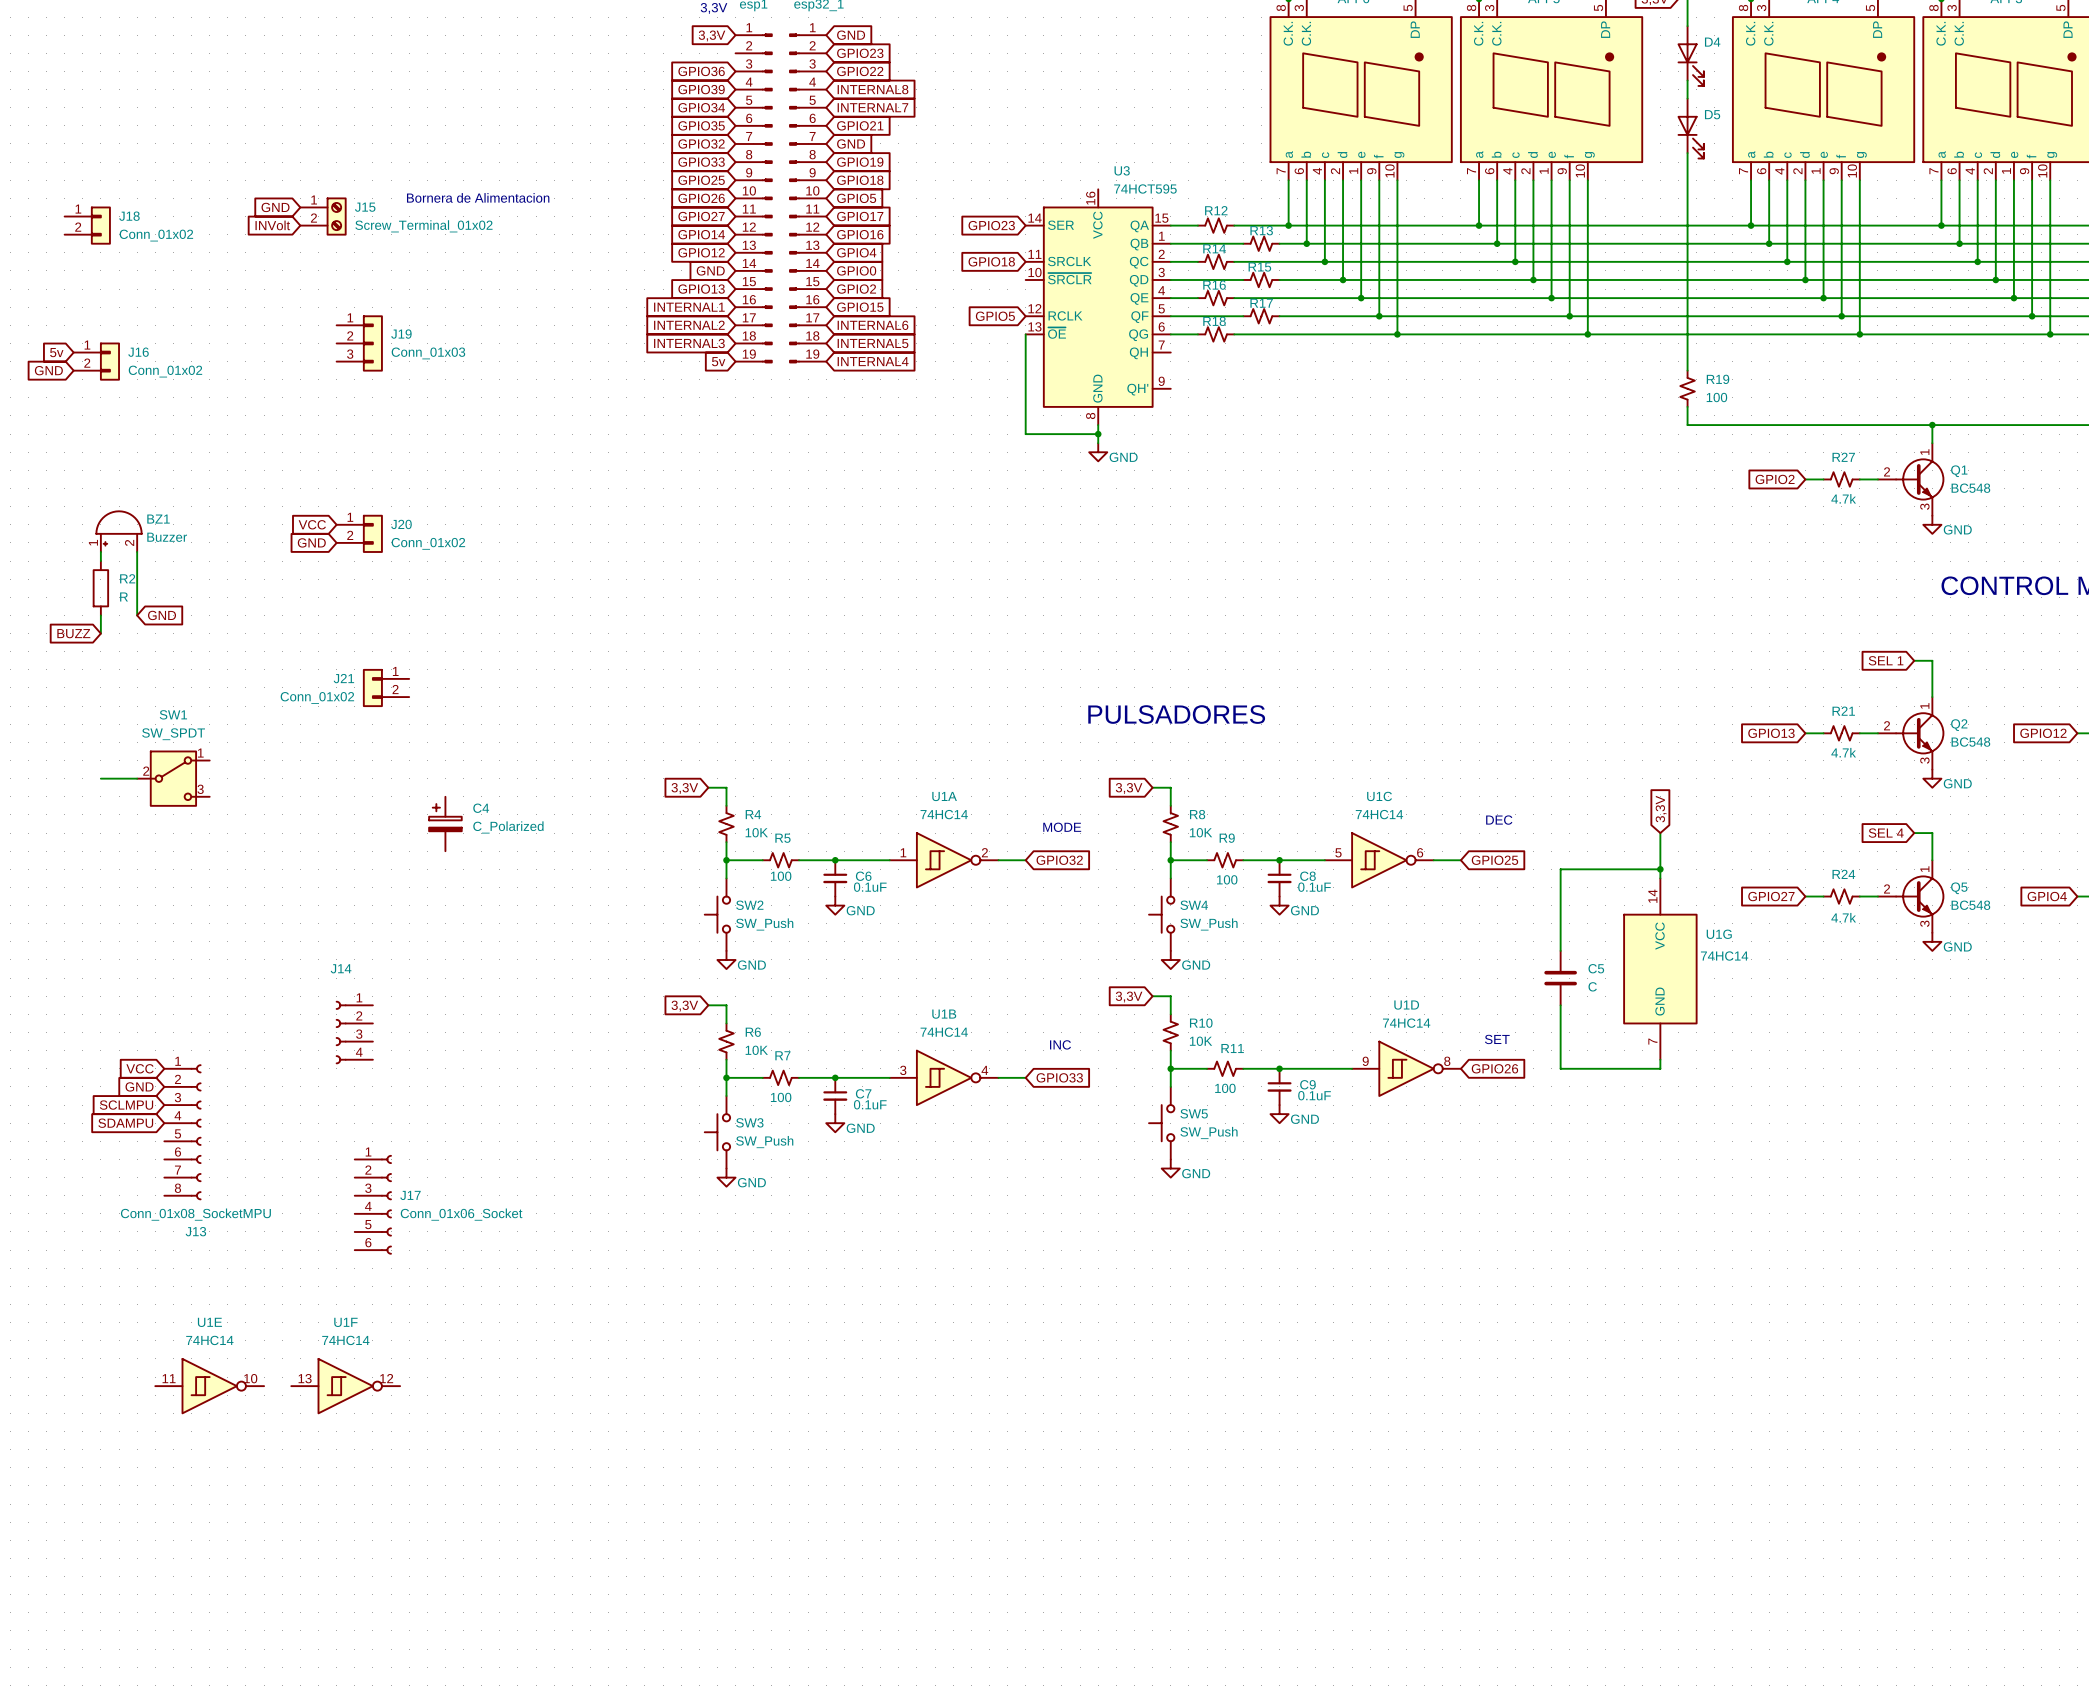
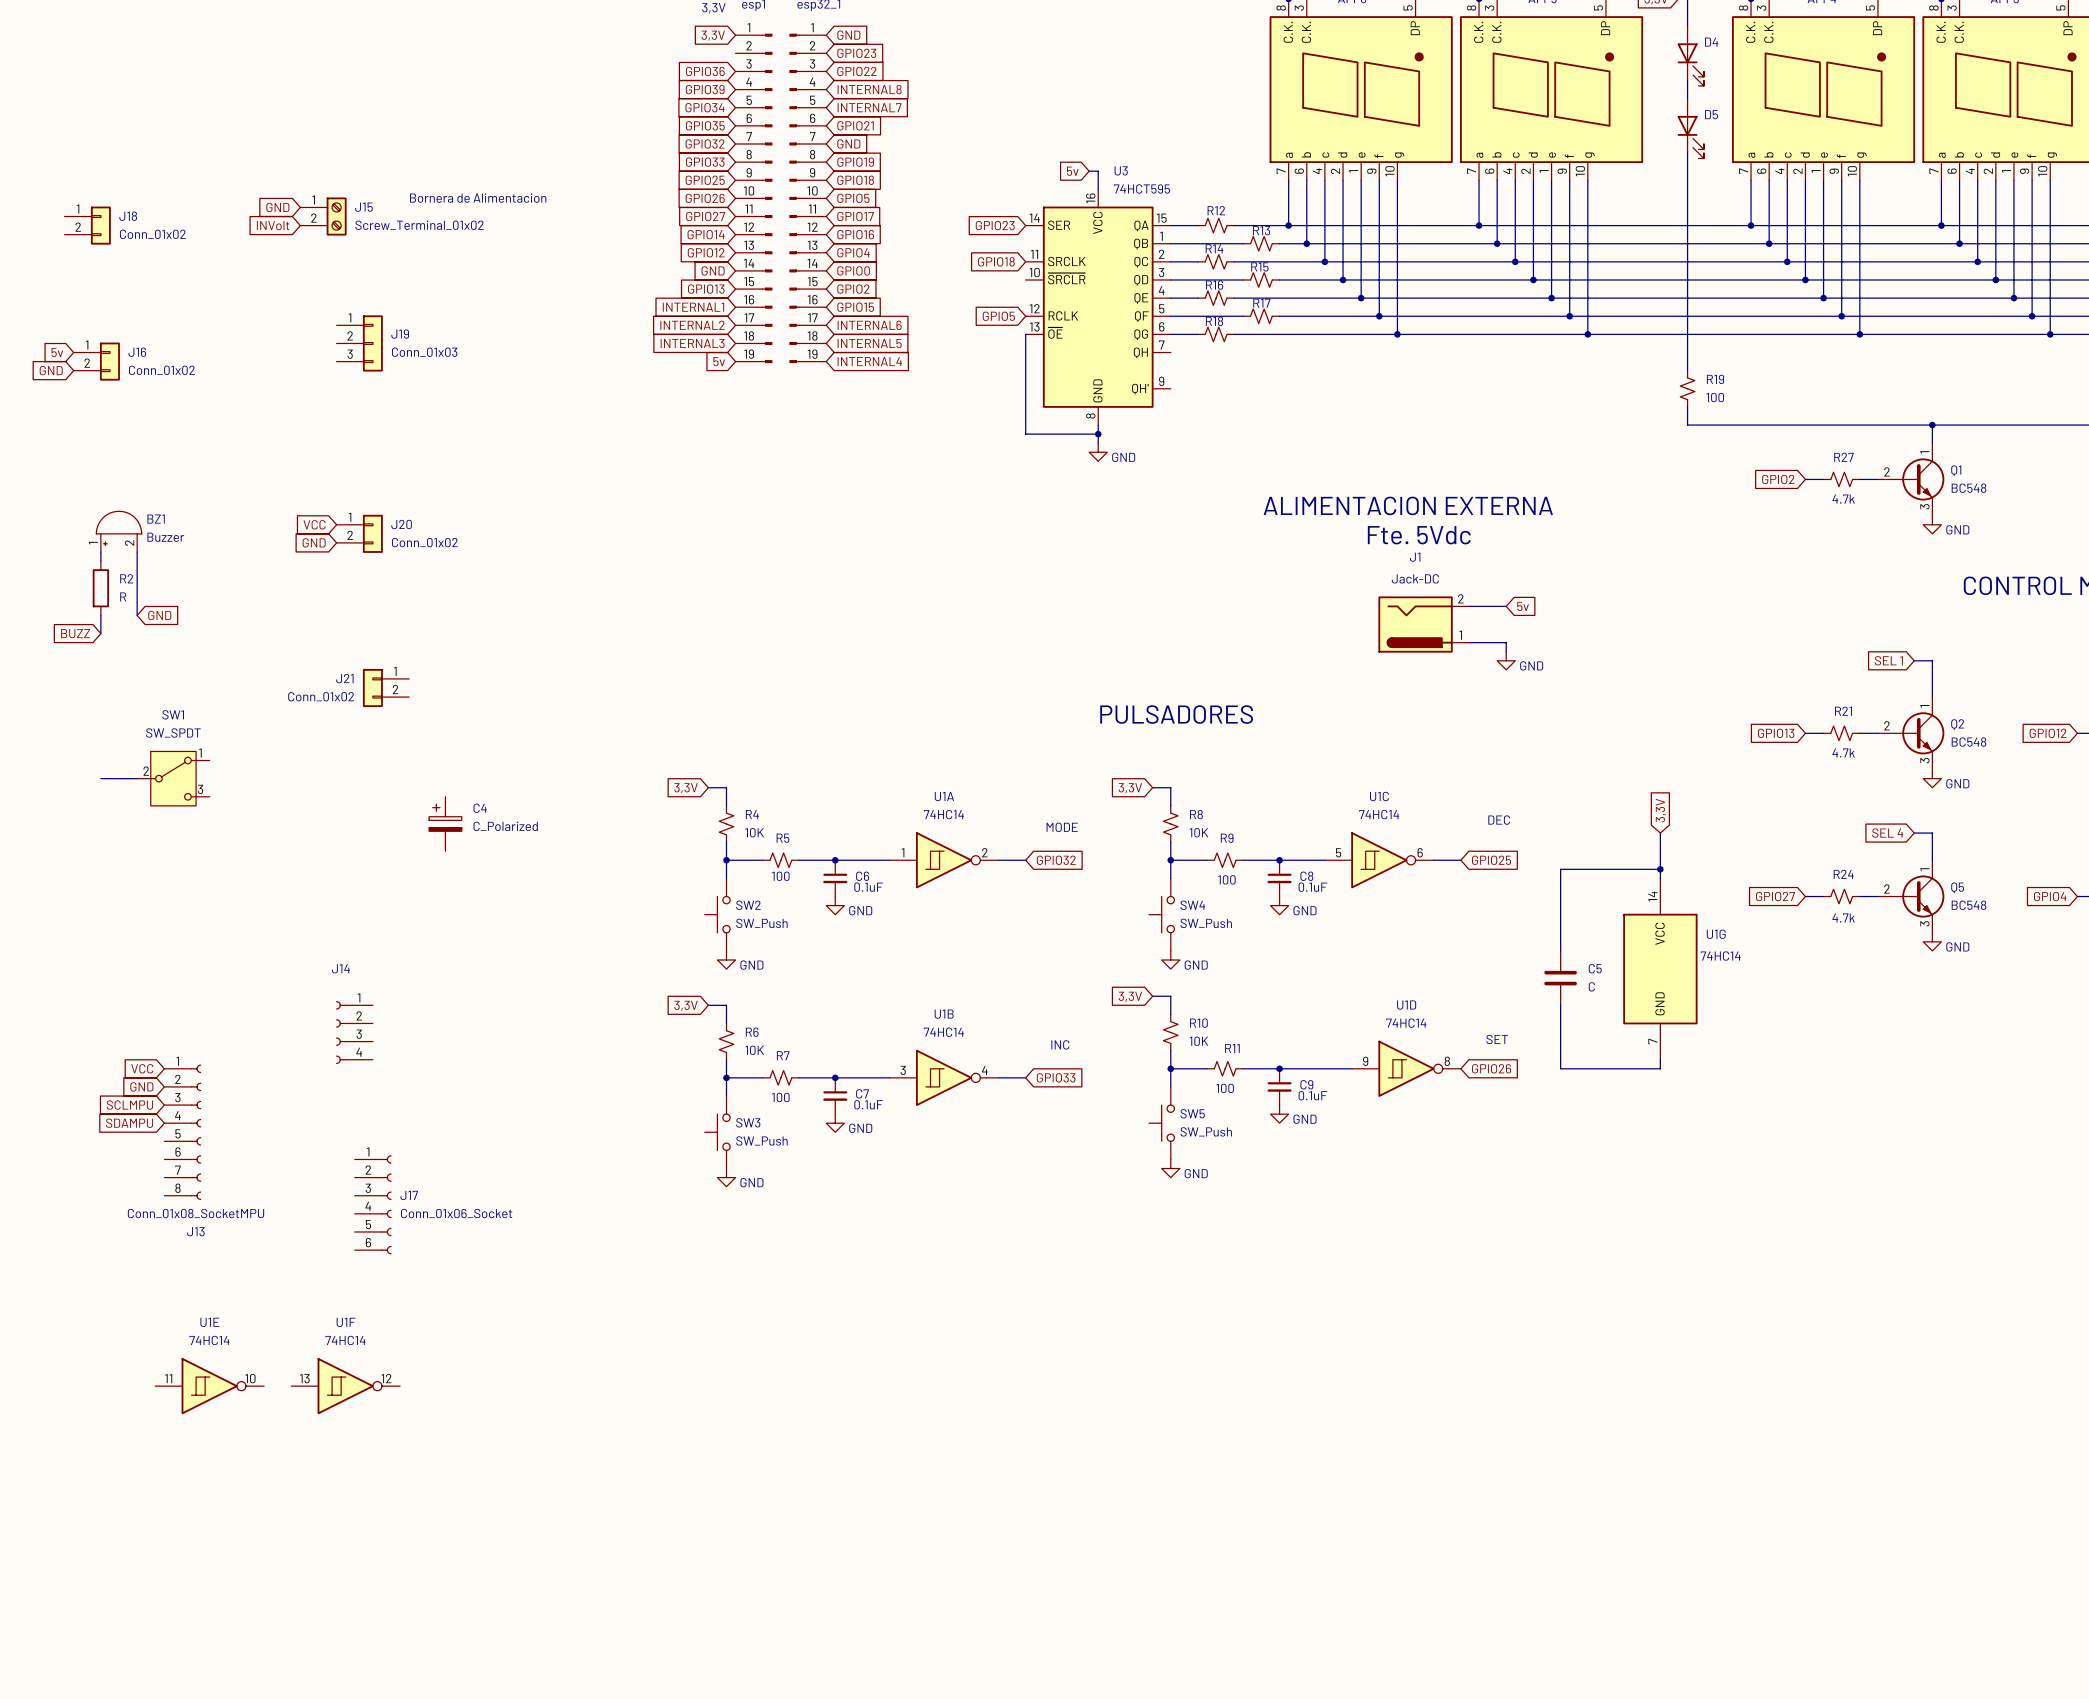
global label: none -> 5v (1072, 171)
wire: none -> (1089, 171) (1098, 171) (1098, 189)
text: none -> ALIMENTACION EXTERNA (1408, 505)
text: none -> Fte. 5Vdc (1419, 535)
wire: none -> (1469, 606) (1506, 606)
global label: none -> 5v (1523, 606)
J1: none -> Jack-DC (1424, 624)
wire: none -> (1469, 642) (1506, 642) (1506, 651)
power symbol: none -> GND (1506, 660)

